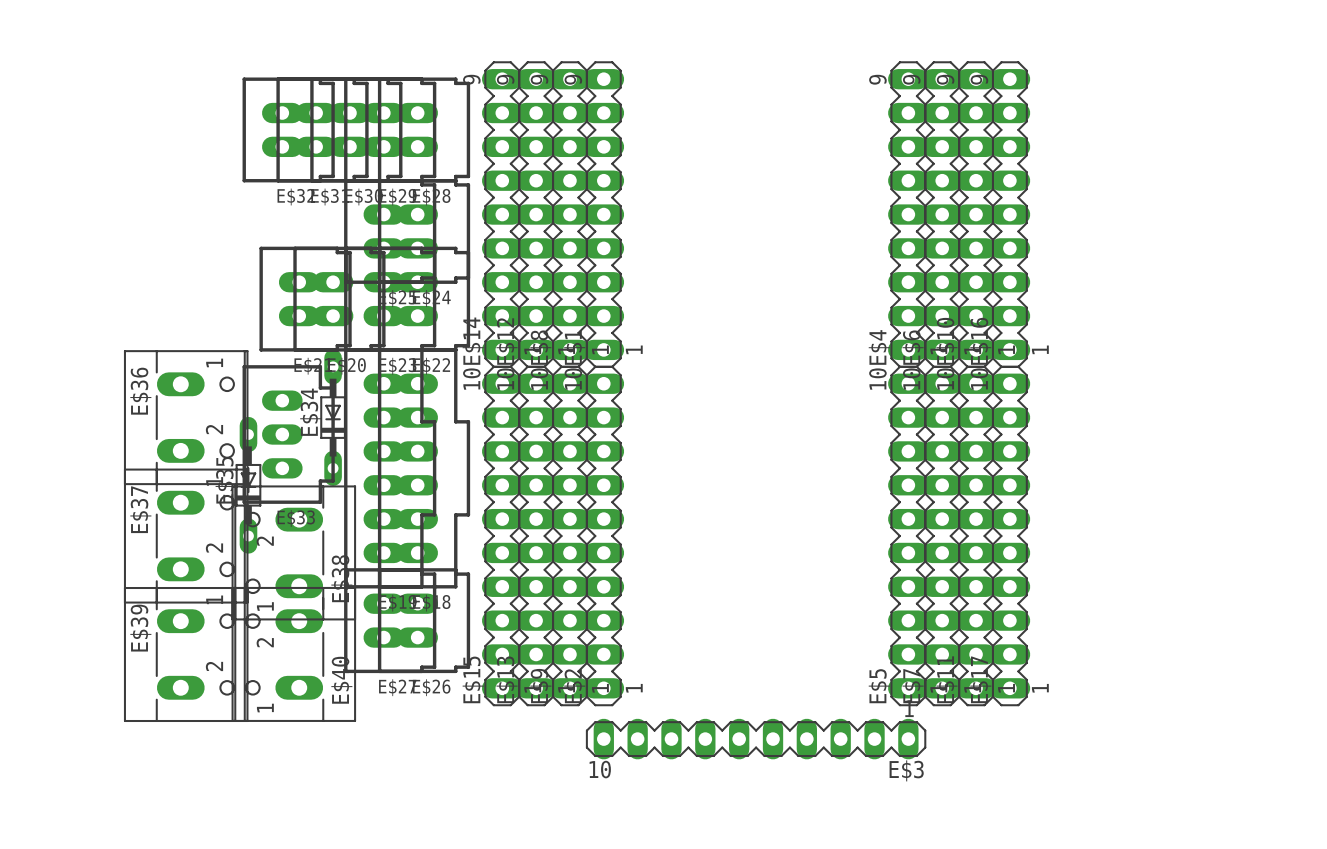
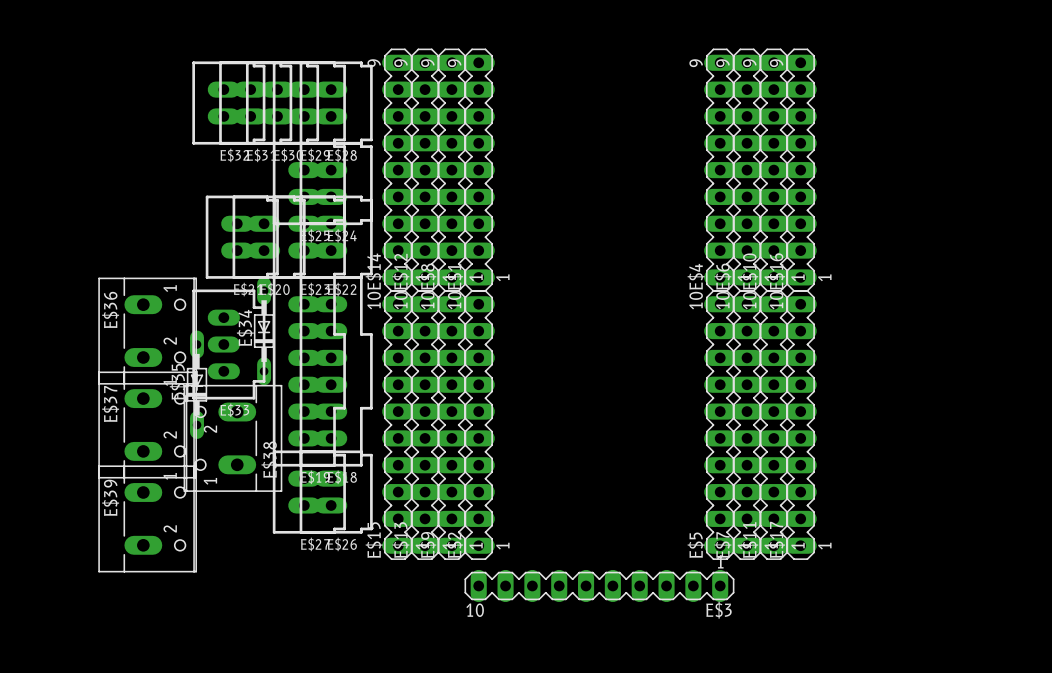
E$40: (293, 654) -> none

